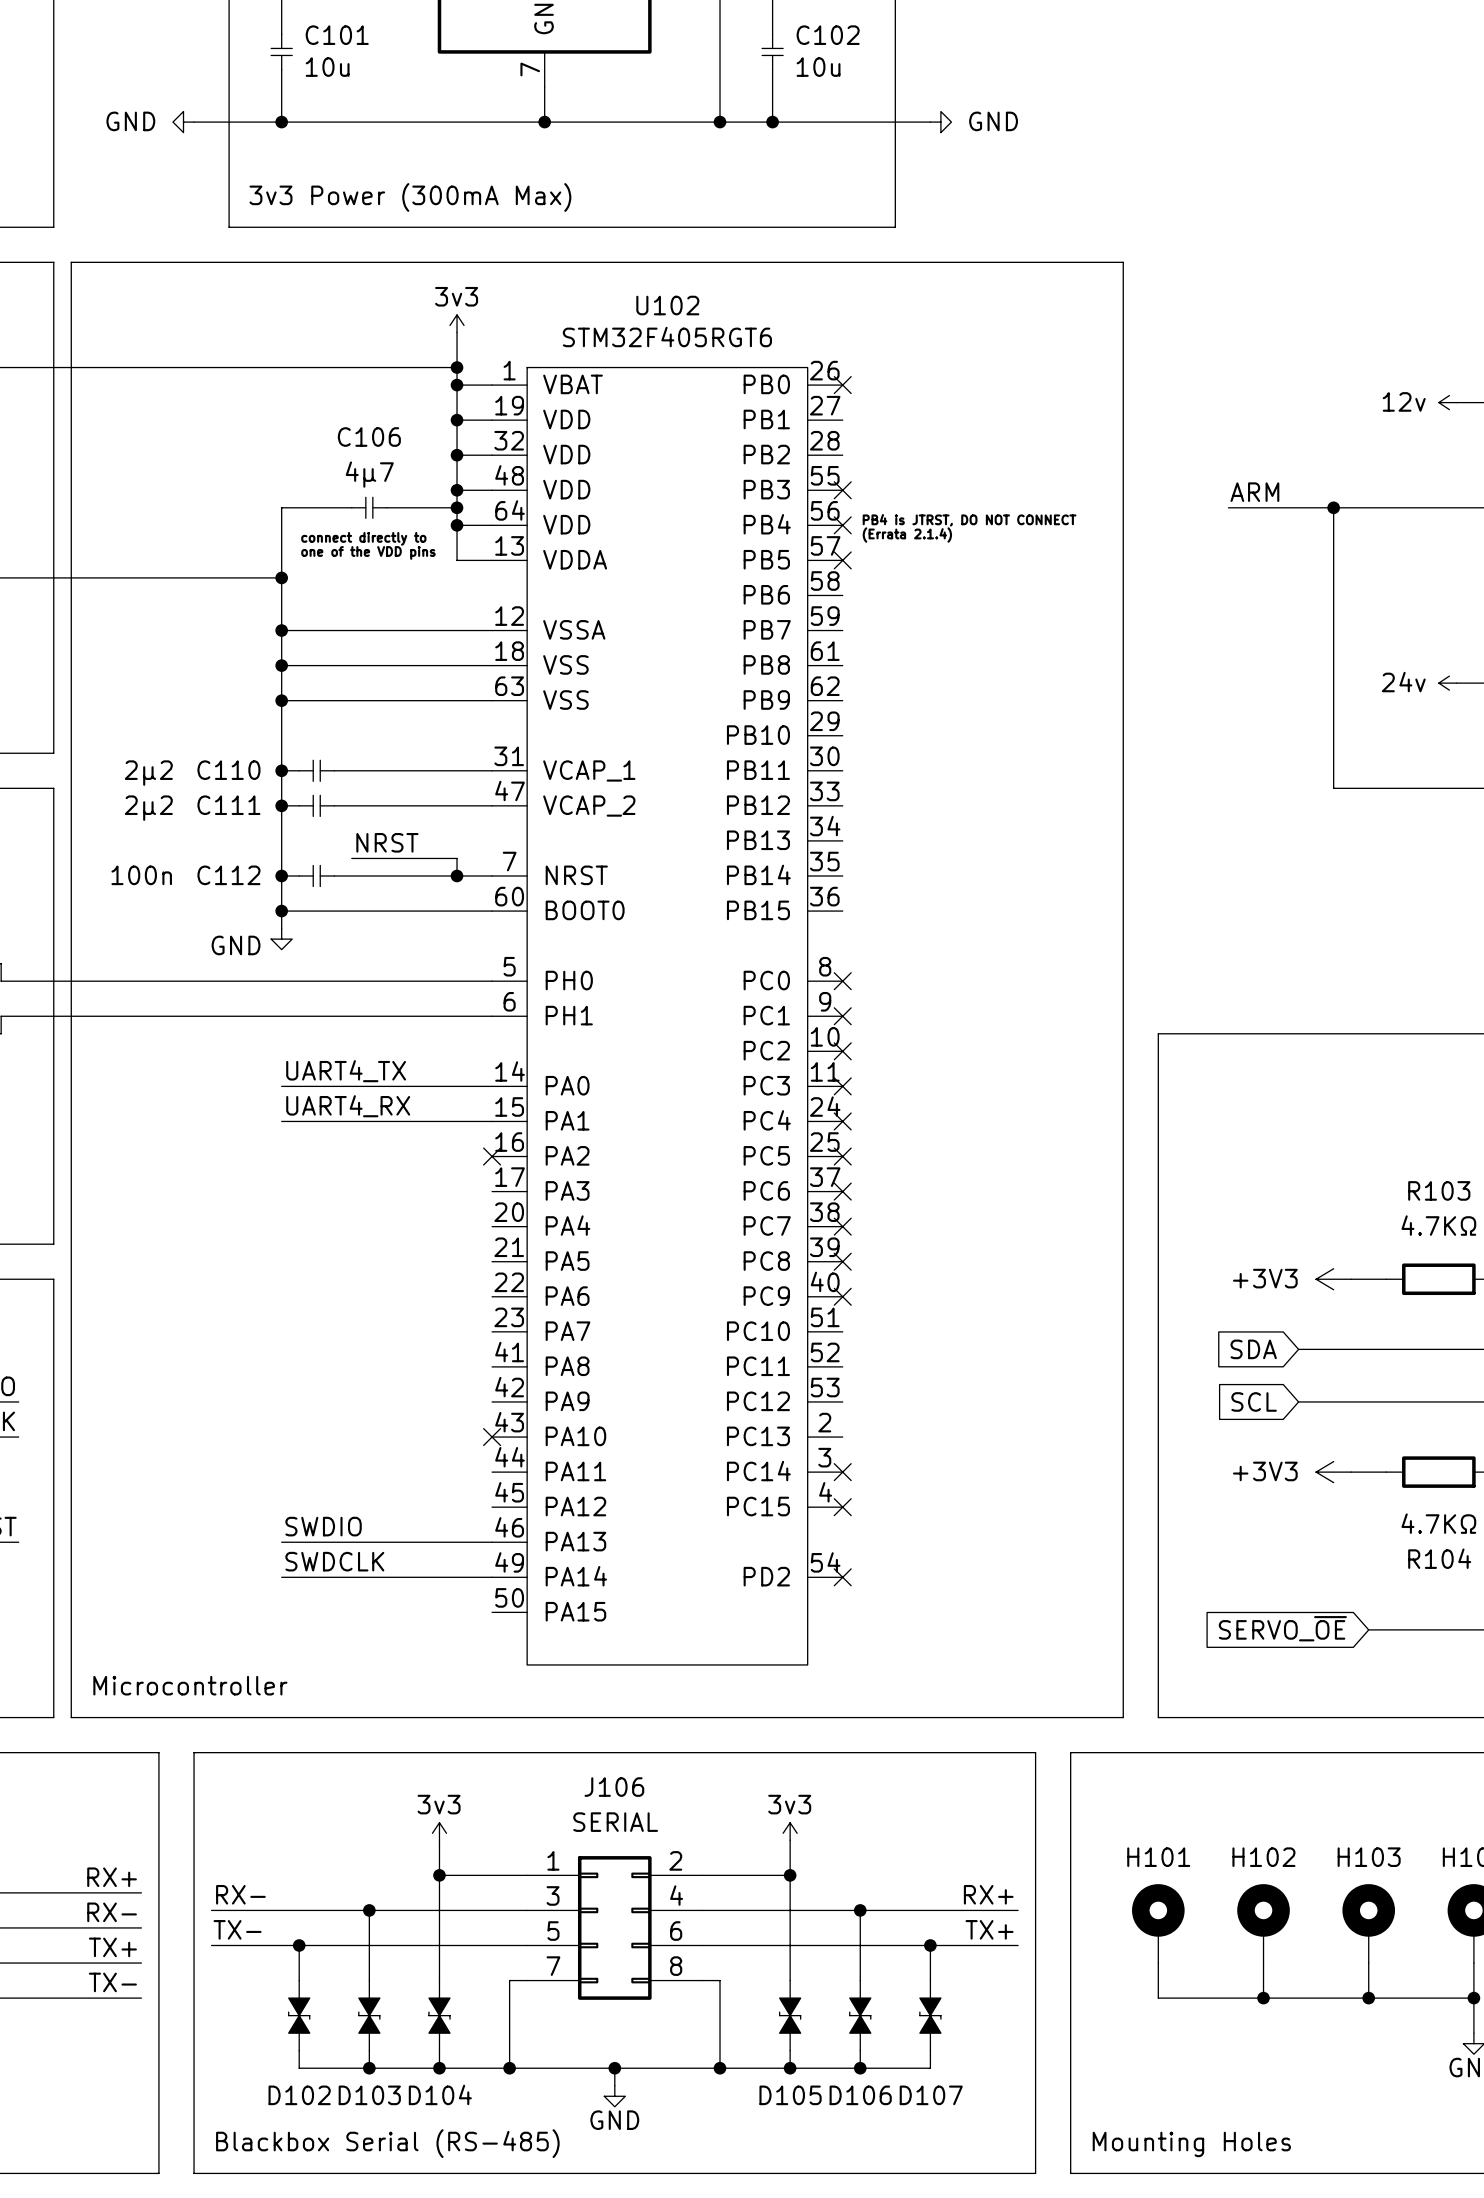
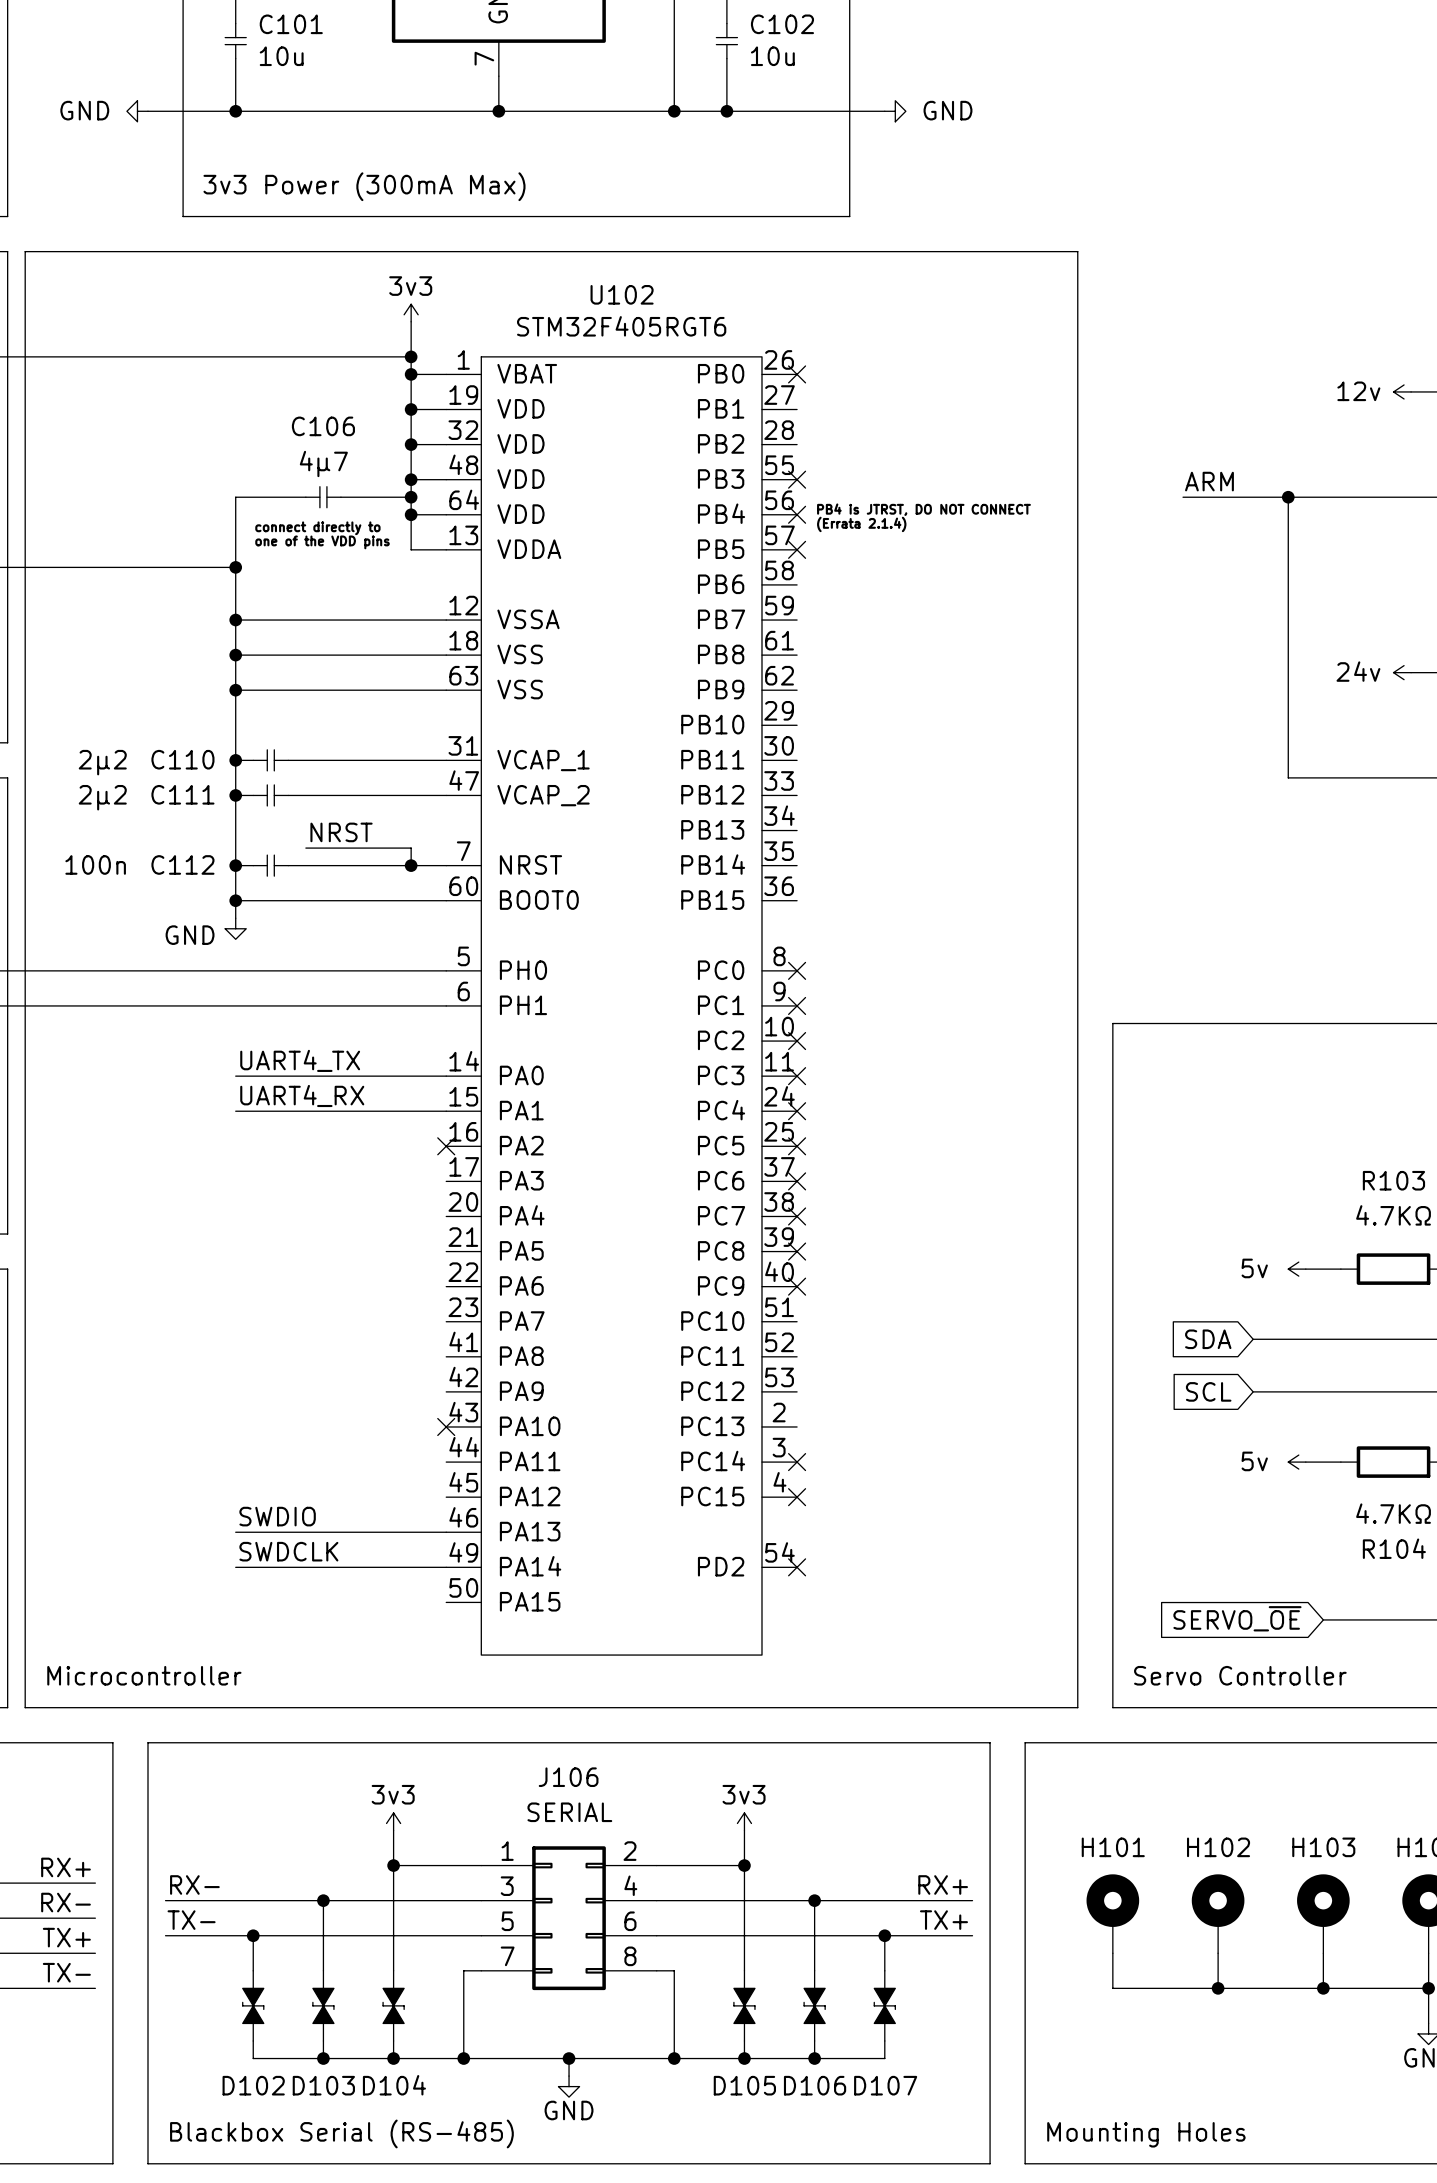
power symbol: +3V3 (1333, 1279) -> 5v (1297, 1269)
power symbol: +3V3 (1333, 1472) -> 5v (1297, 1462)
text: none -> Servo Controller (1240, 1675)

